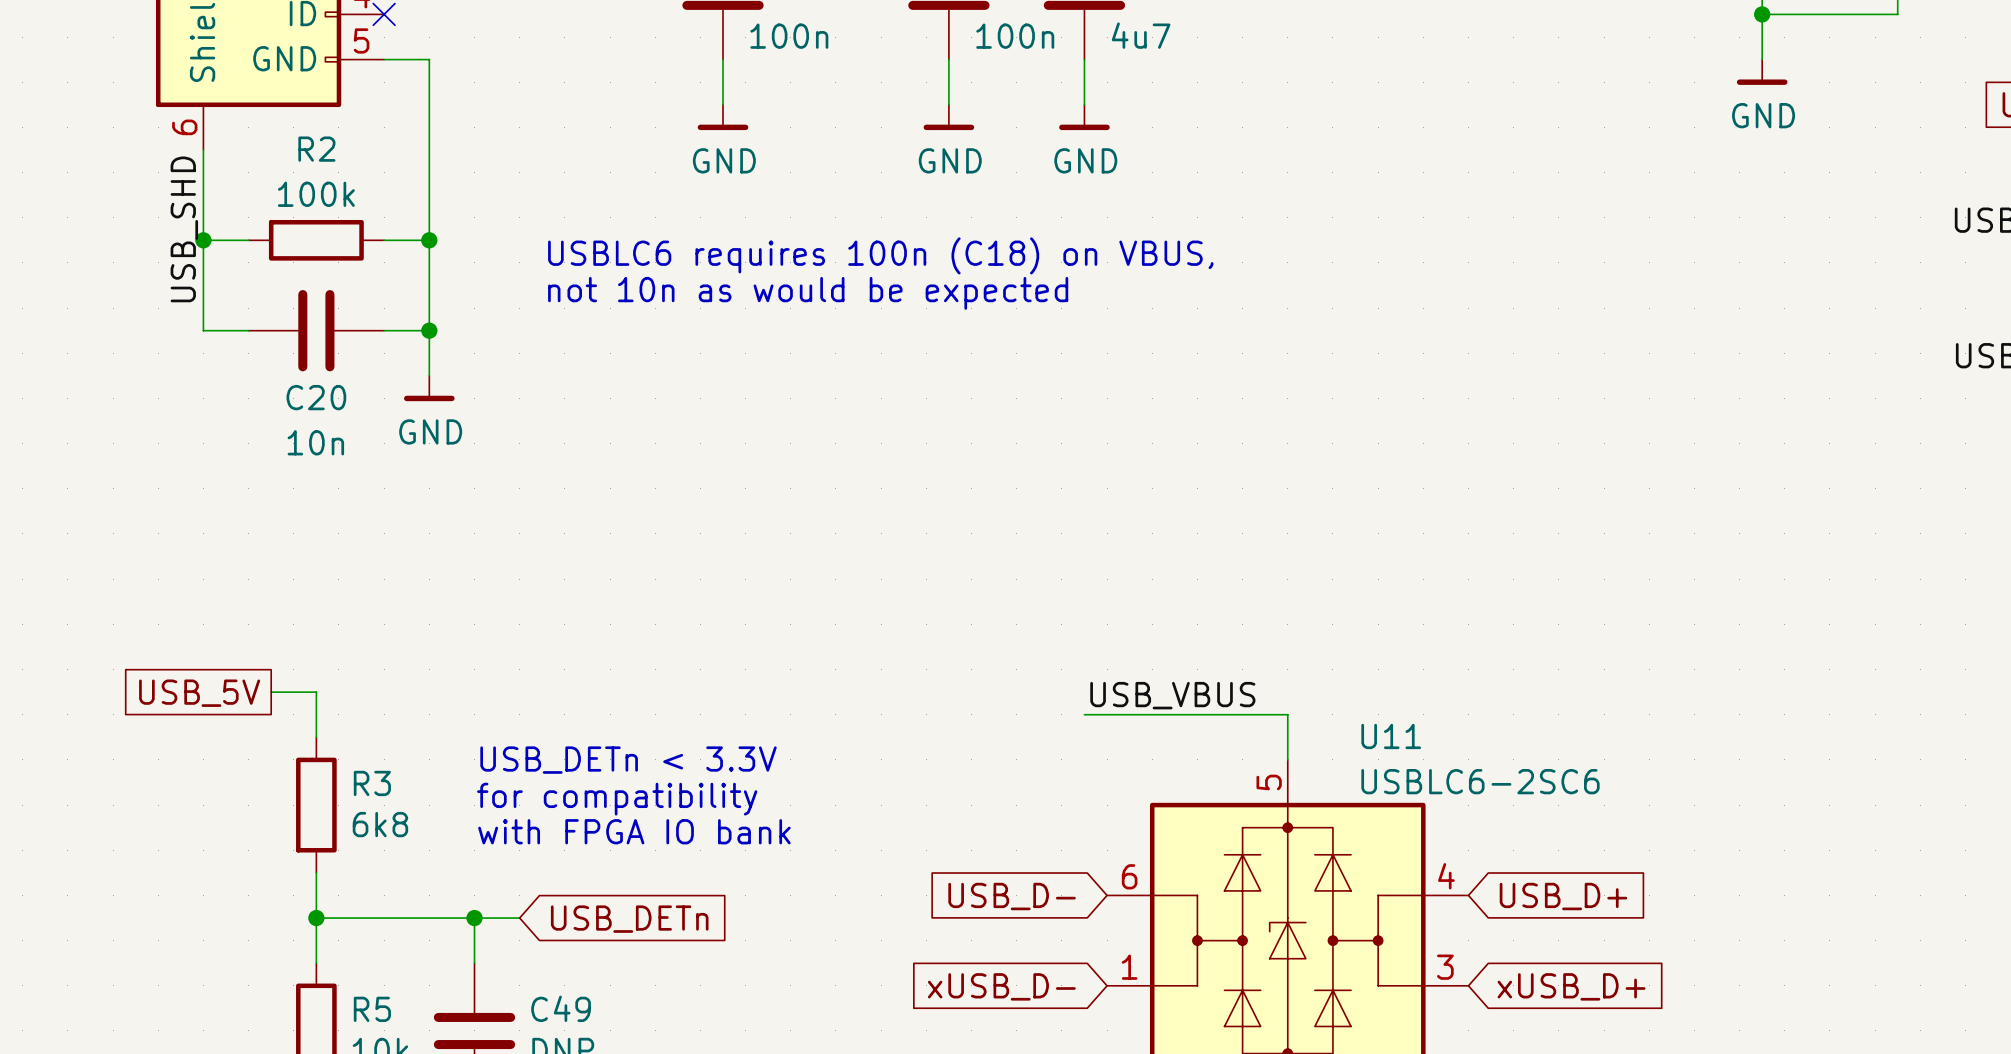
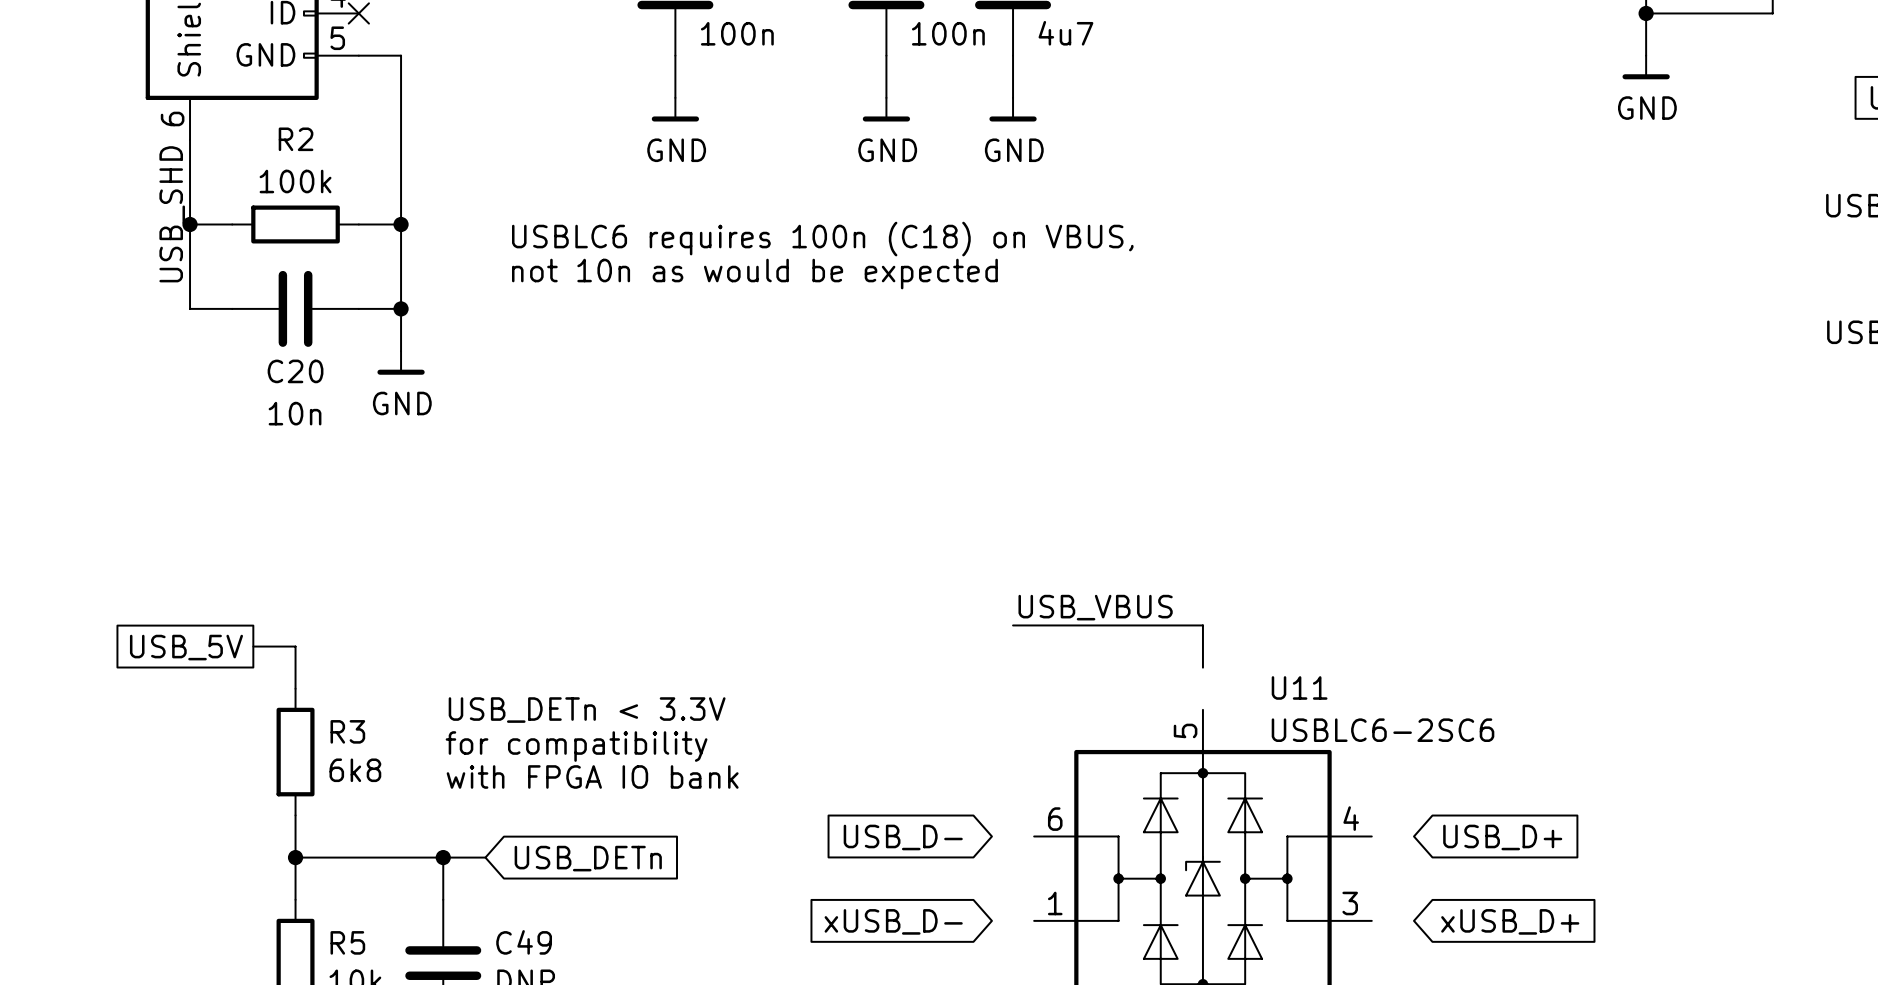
label position: USB_VBUS (1172, 695) -> USB_VBUS (1095, 607)
wire: (1084, 714) (1287, 714) (1287, 759) -> (1013, 625) (1202, 625) (1202, 667)
global label position: USB_D- (1012, 896) -> USB_D- (903, 837)
global label position: USB_D+ (1563, 896) -> USB_D+ (1502, 837)
global label position: xUSB_D- (1001, 986) -> xUSB_D- (893, 921)
global label position: xUSB_D+ (1571, 986) -> xUSB_D+ (1510, 921)

